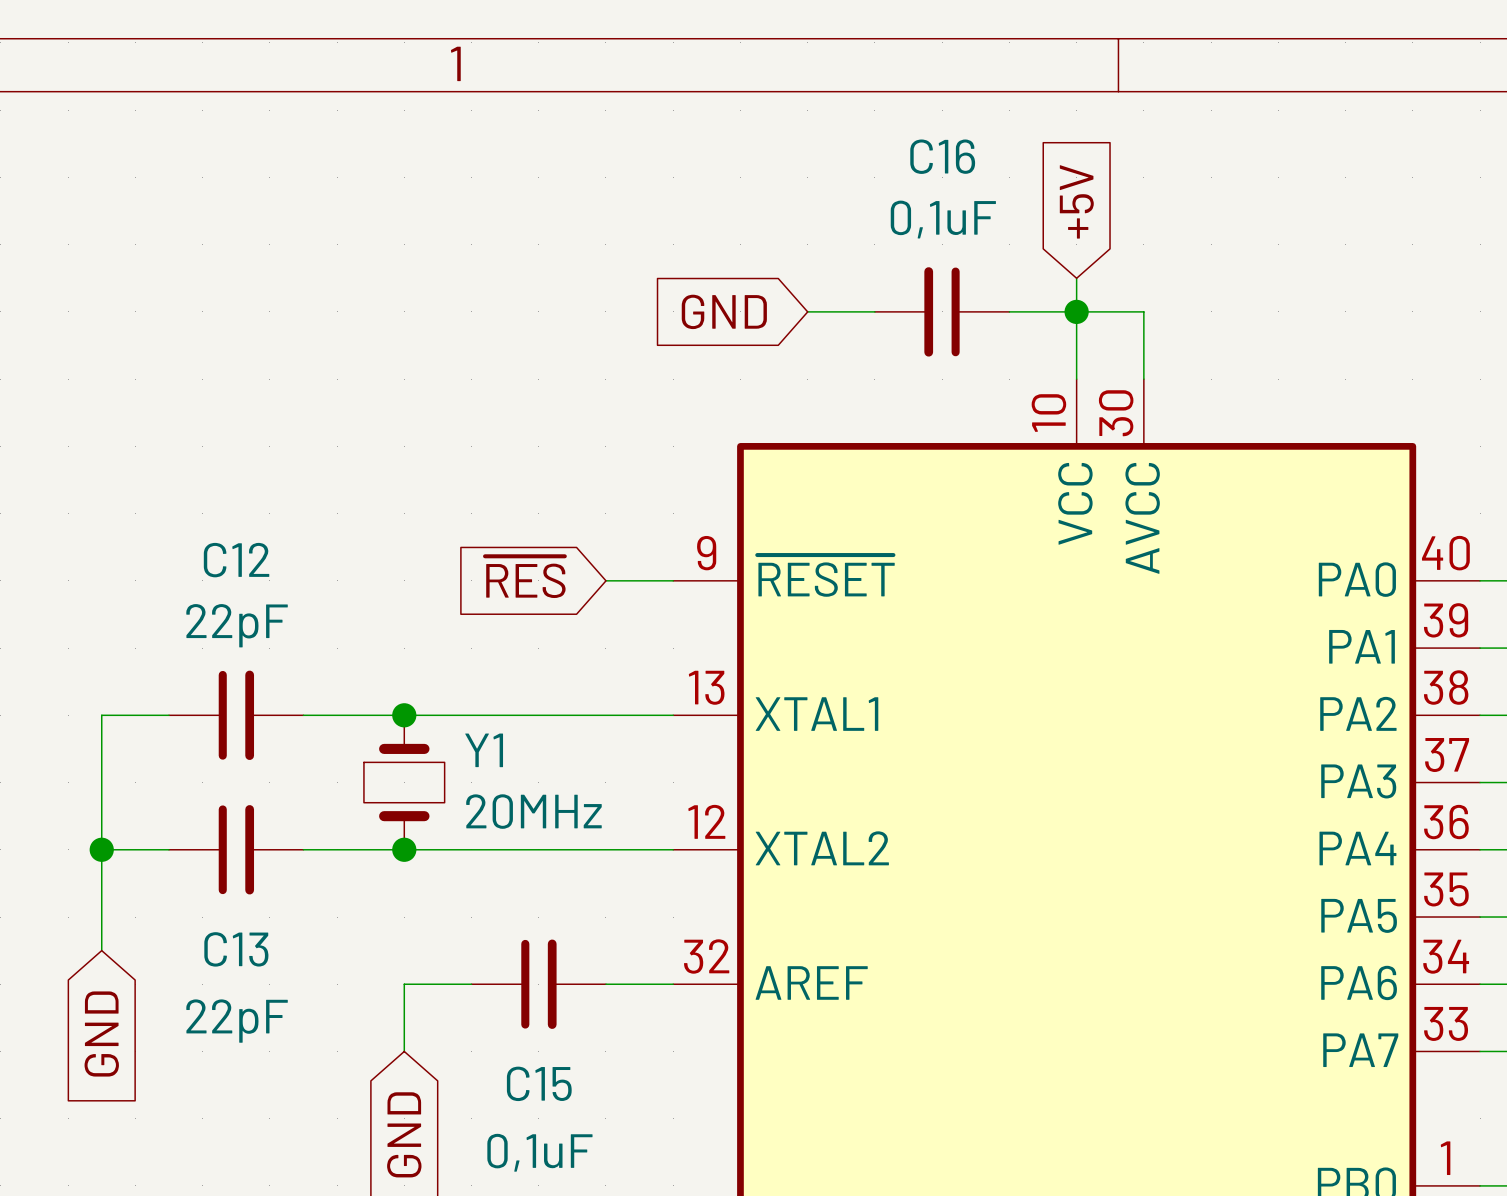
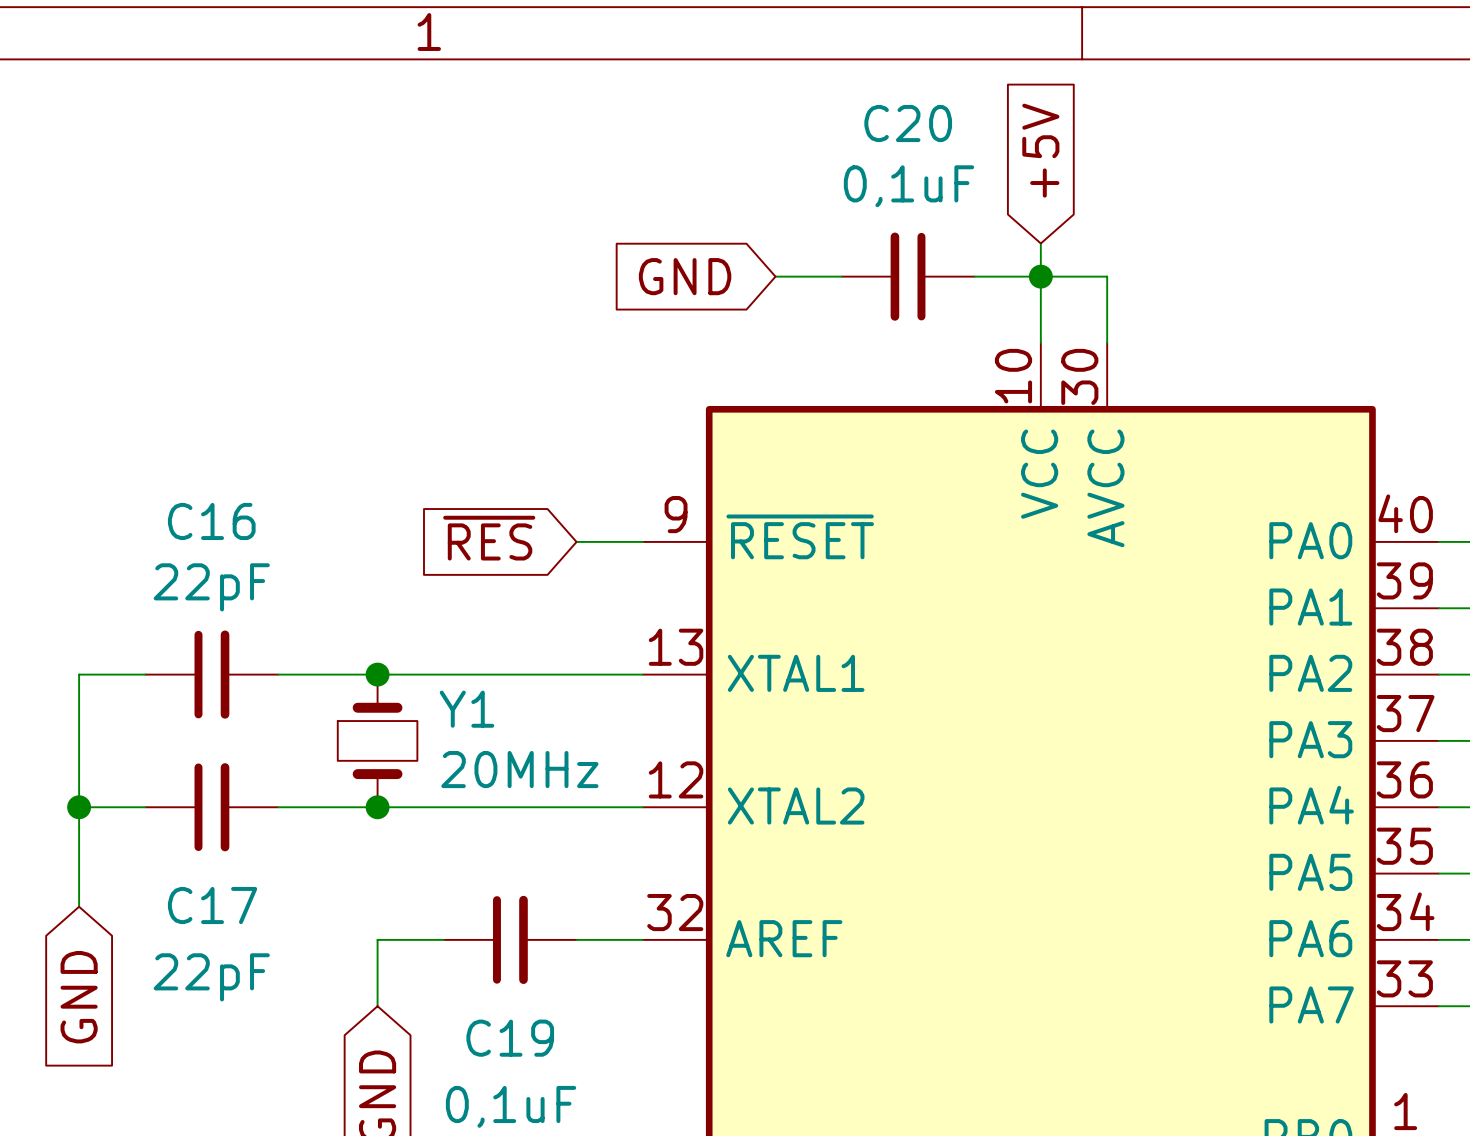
C16 name: C16 (942, 156) -> C20 (908, 123)
C12 name: C12 (236, 560) -> C16 (211, 521)
C13 name: C13 (236, 949) -> C17 (212, 905)
C15 name: C15 (539, 1083) -> C19 (510, 1038)

